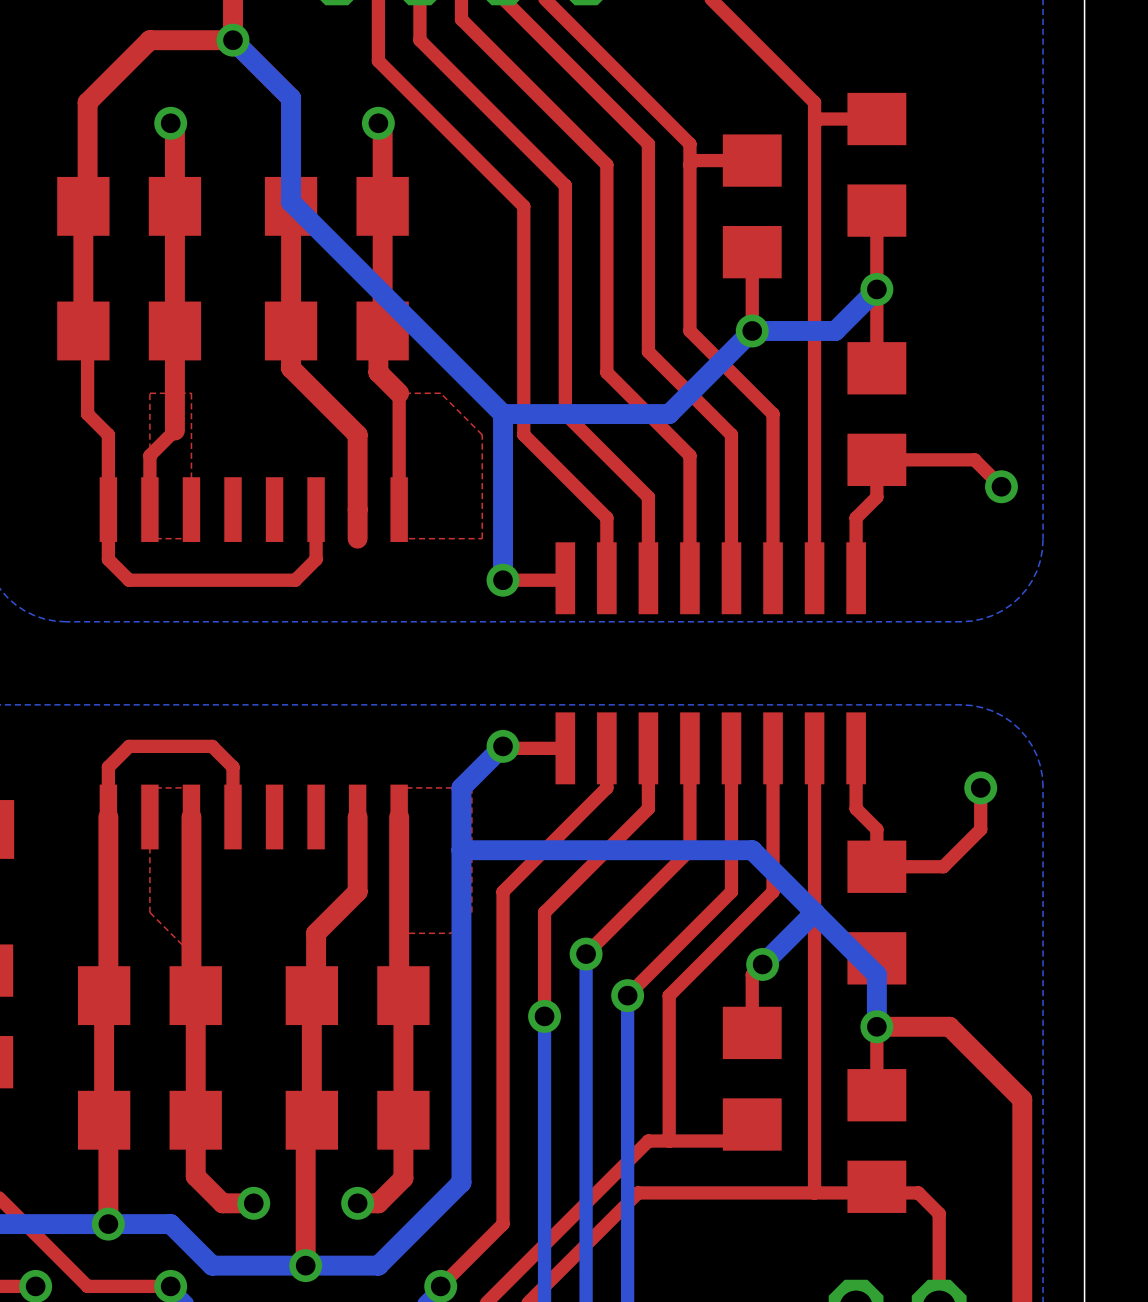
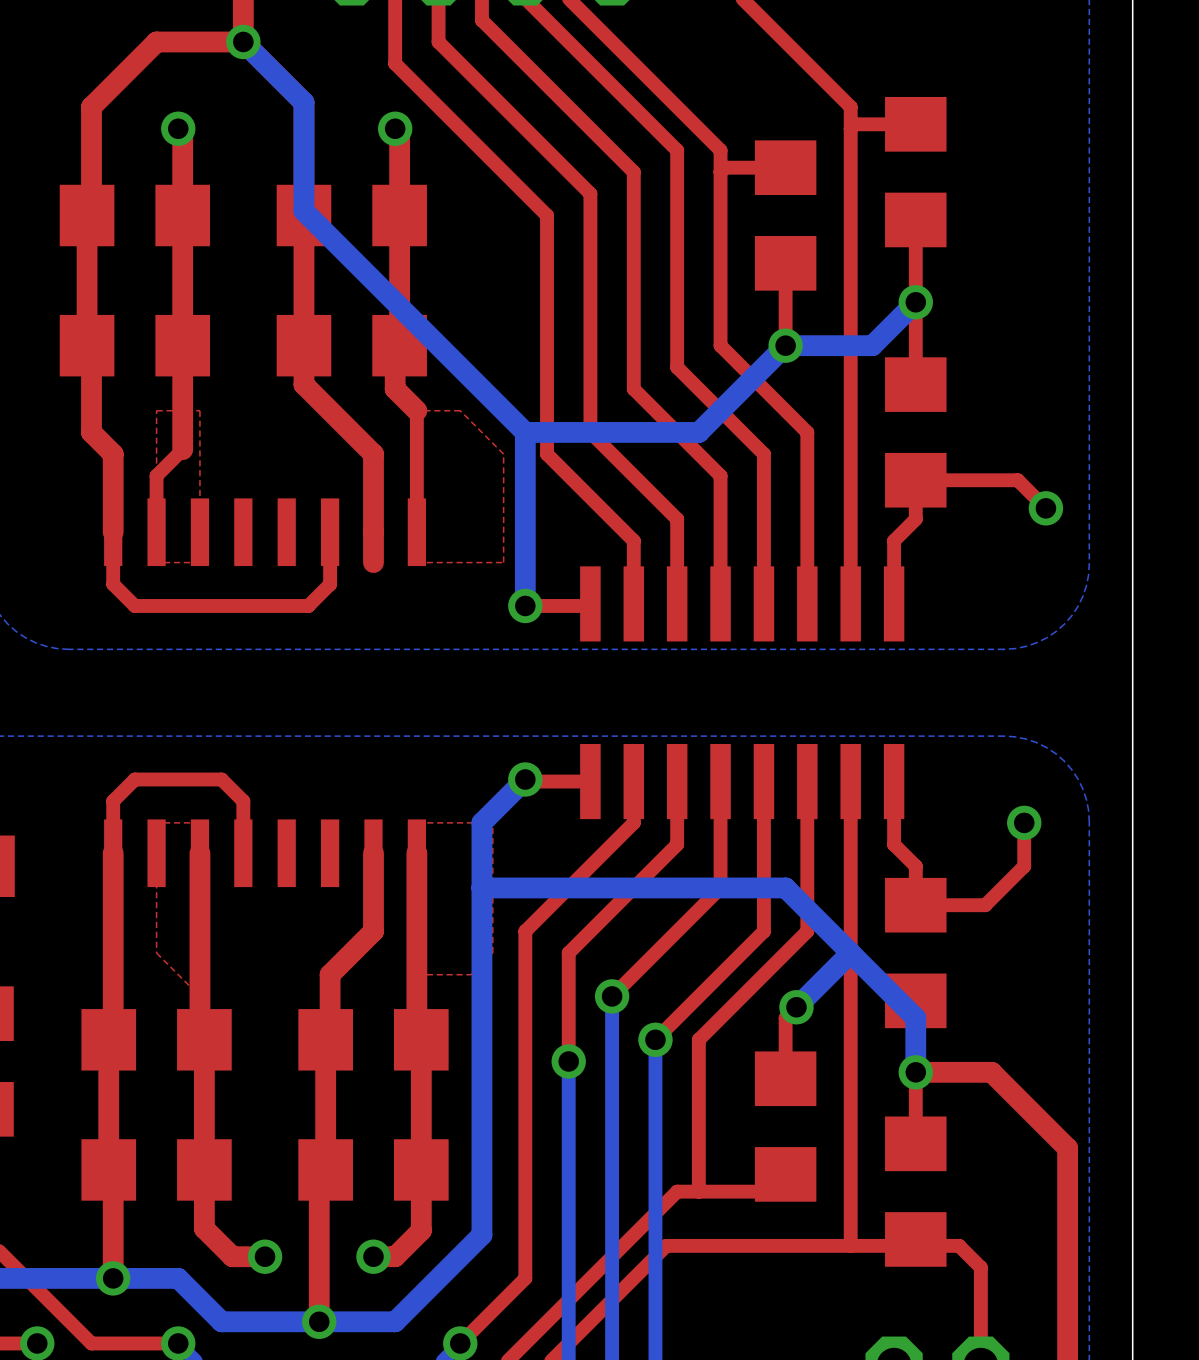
top track width: thin (83, 330) (87, 335) (87, 414) (108, 434) (108, 509) -> thick (87, 345) (91, 350) (91, 432) (113, 454) (113, 532)

